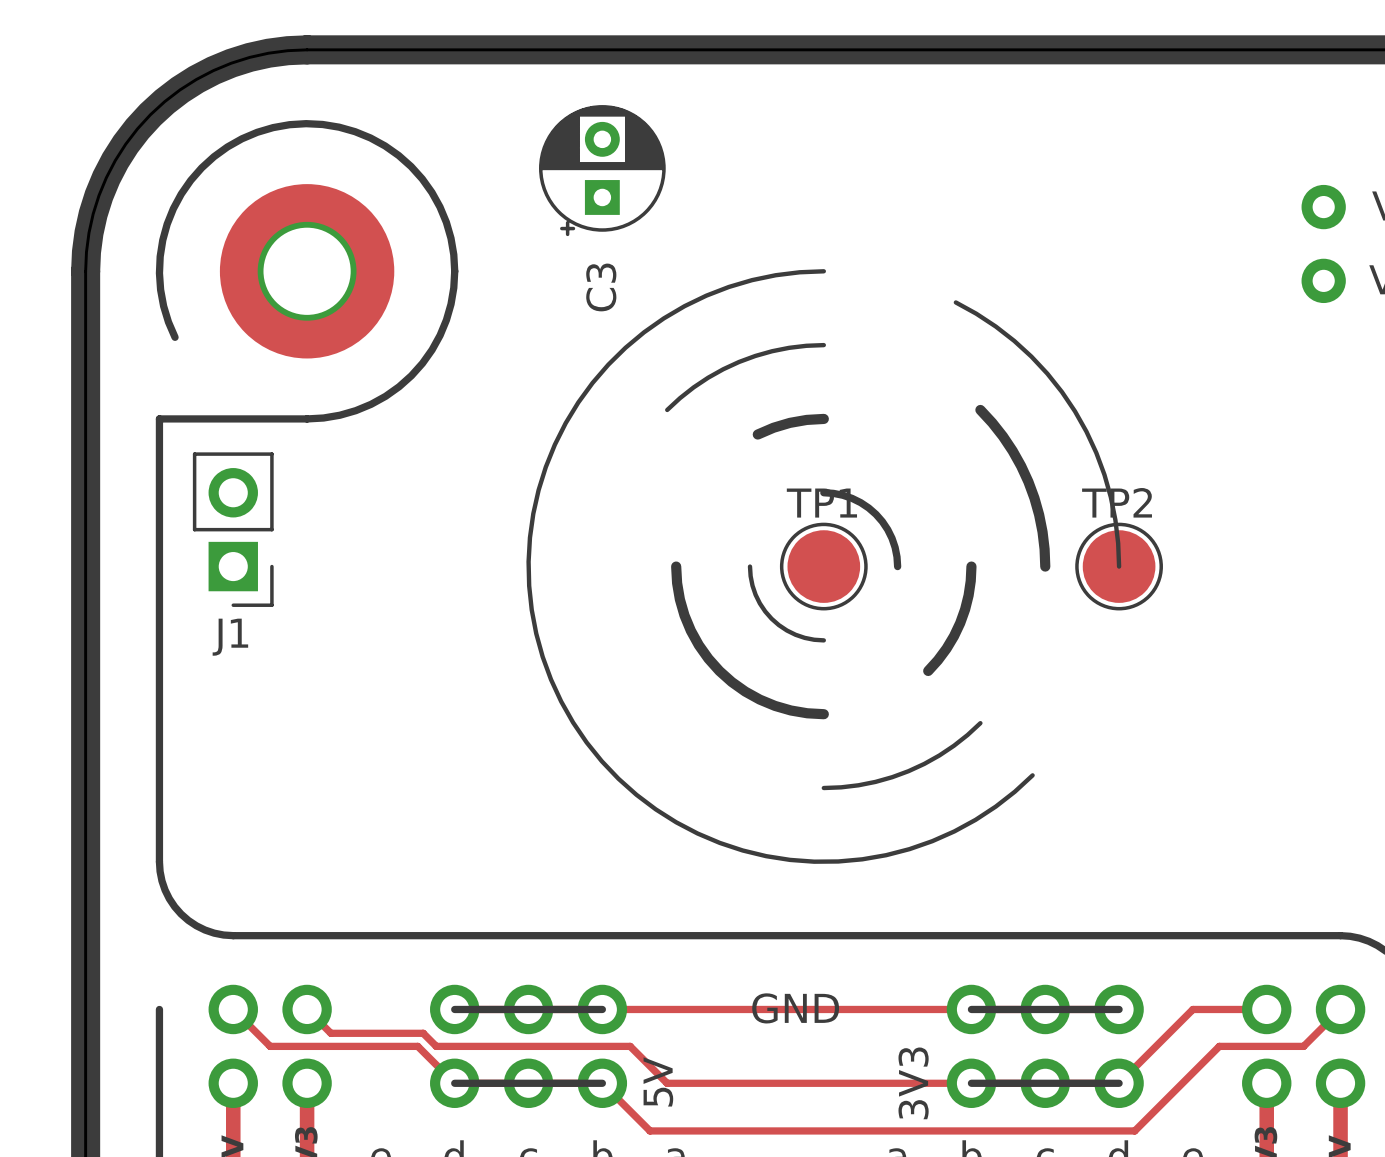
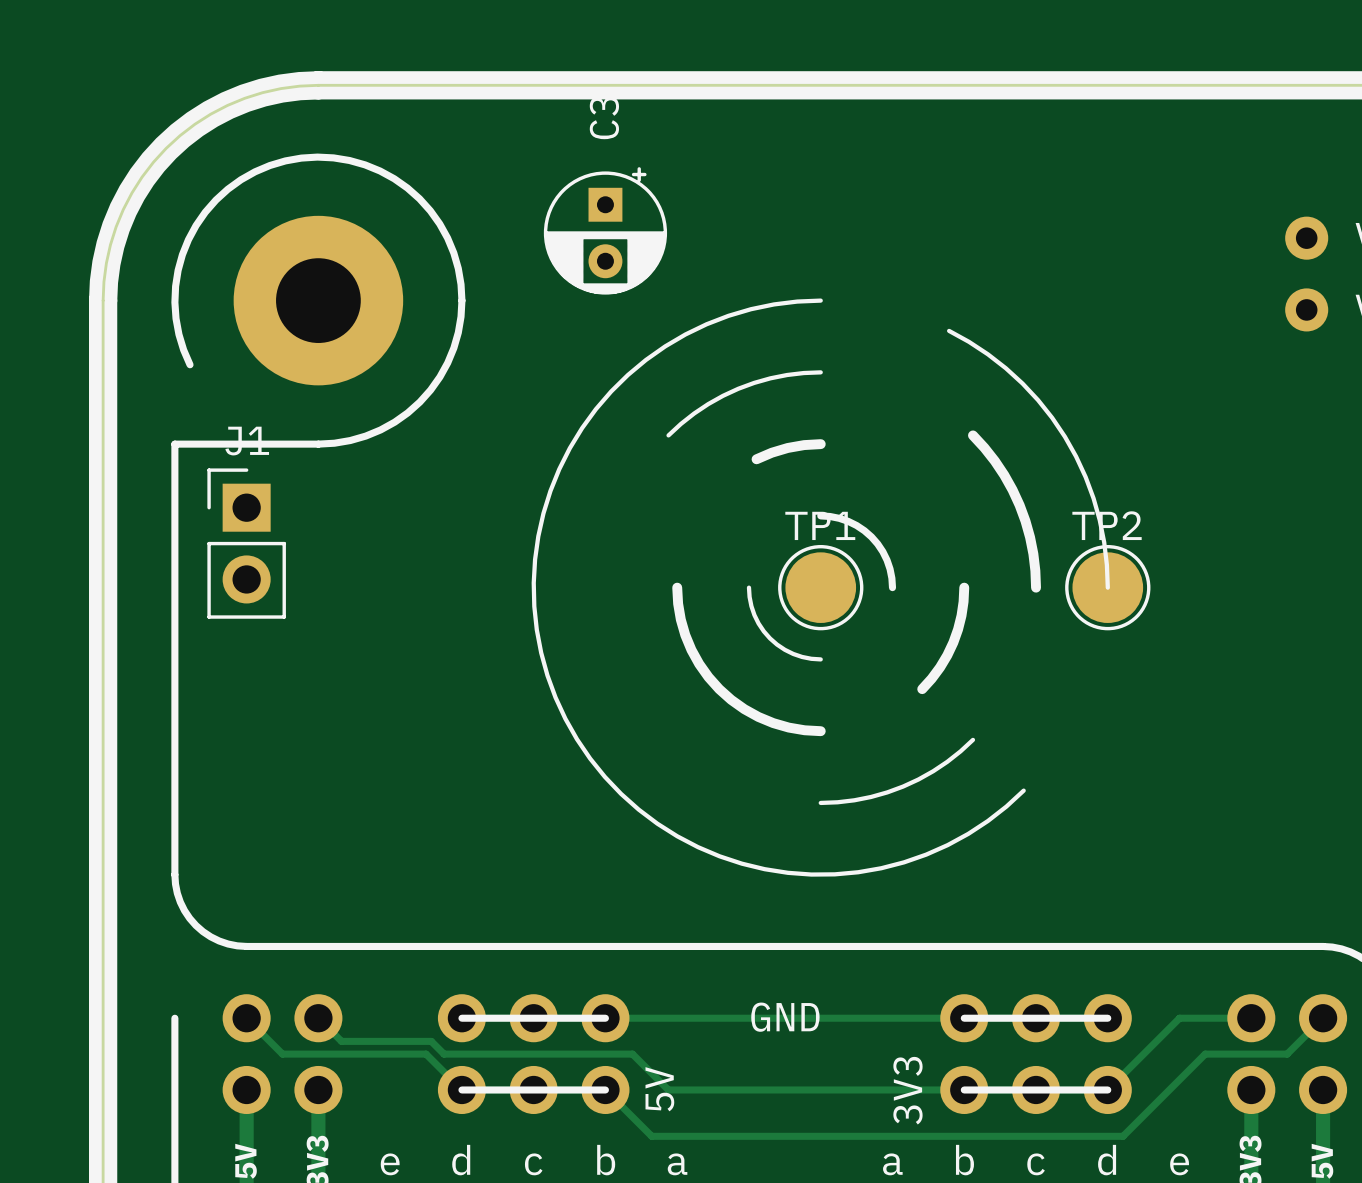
C3 rotation: 0° (602, 170) -> 180° (605, 230)
J1 rotation: 0° (233, 529) -> 180° (246, 543)

